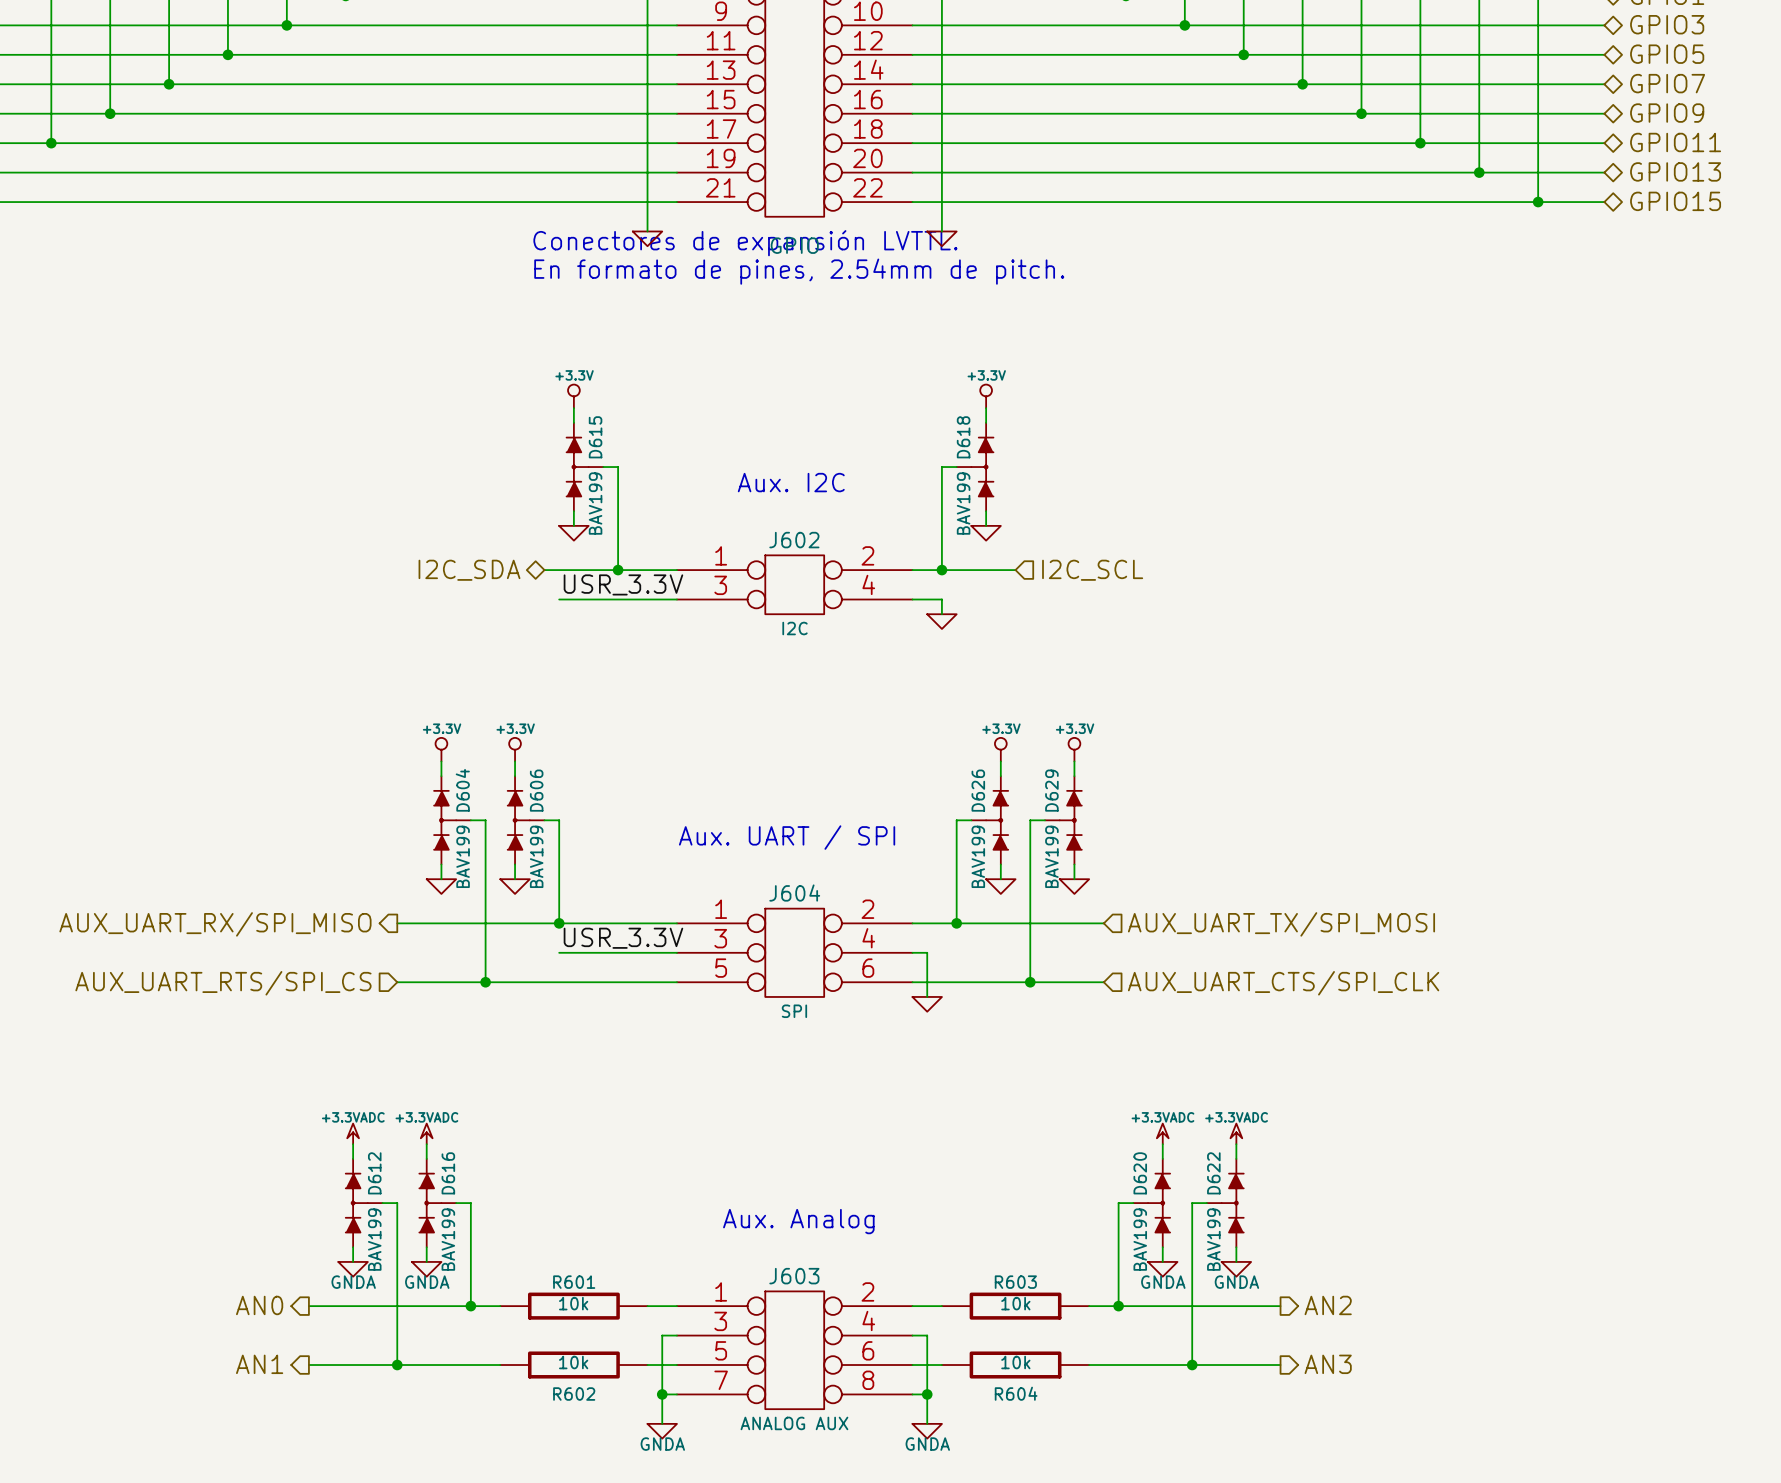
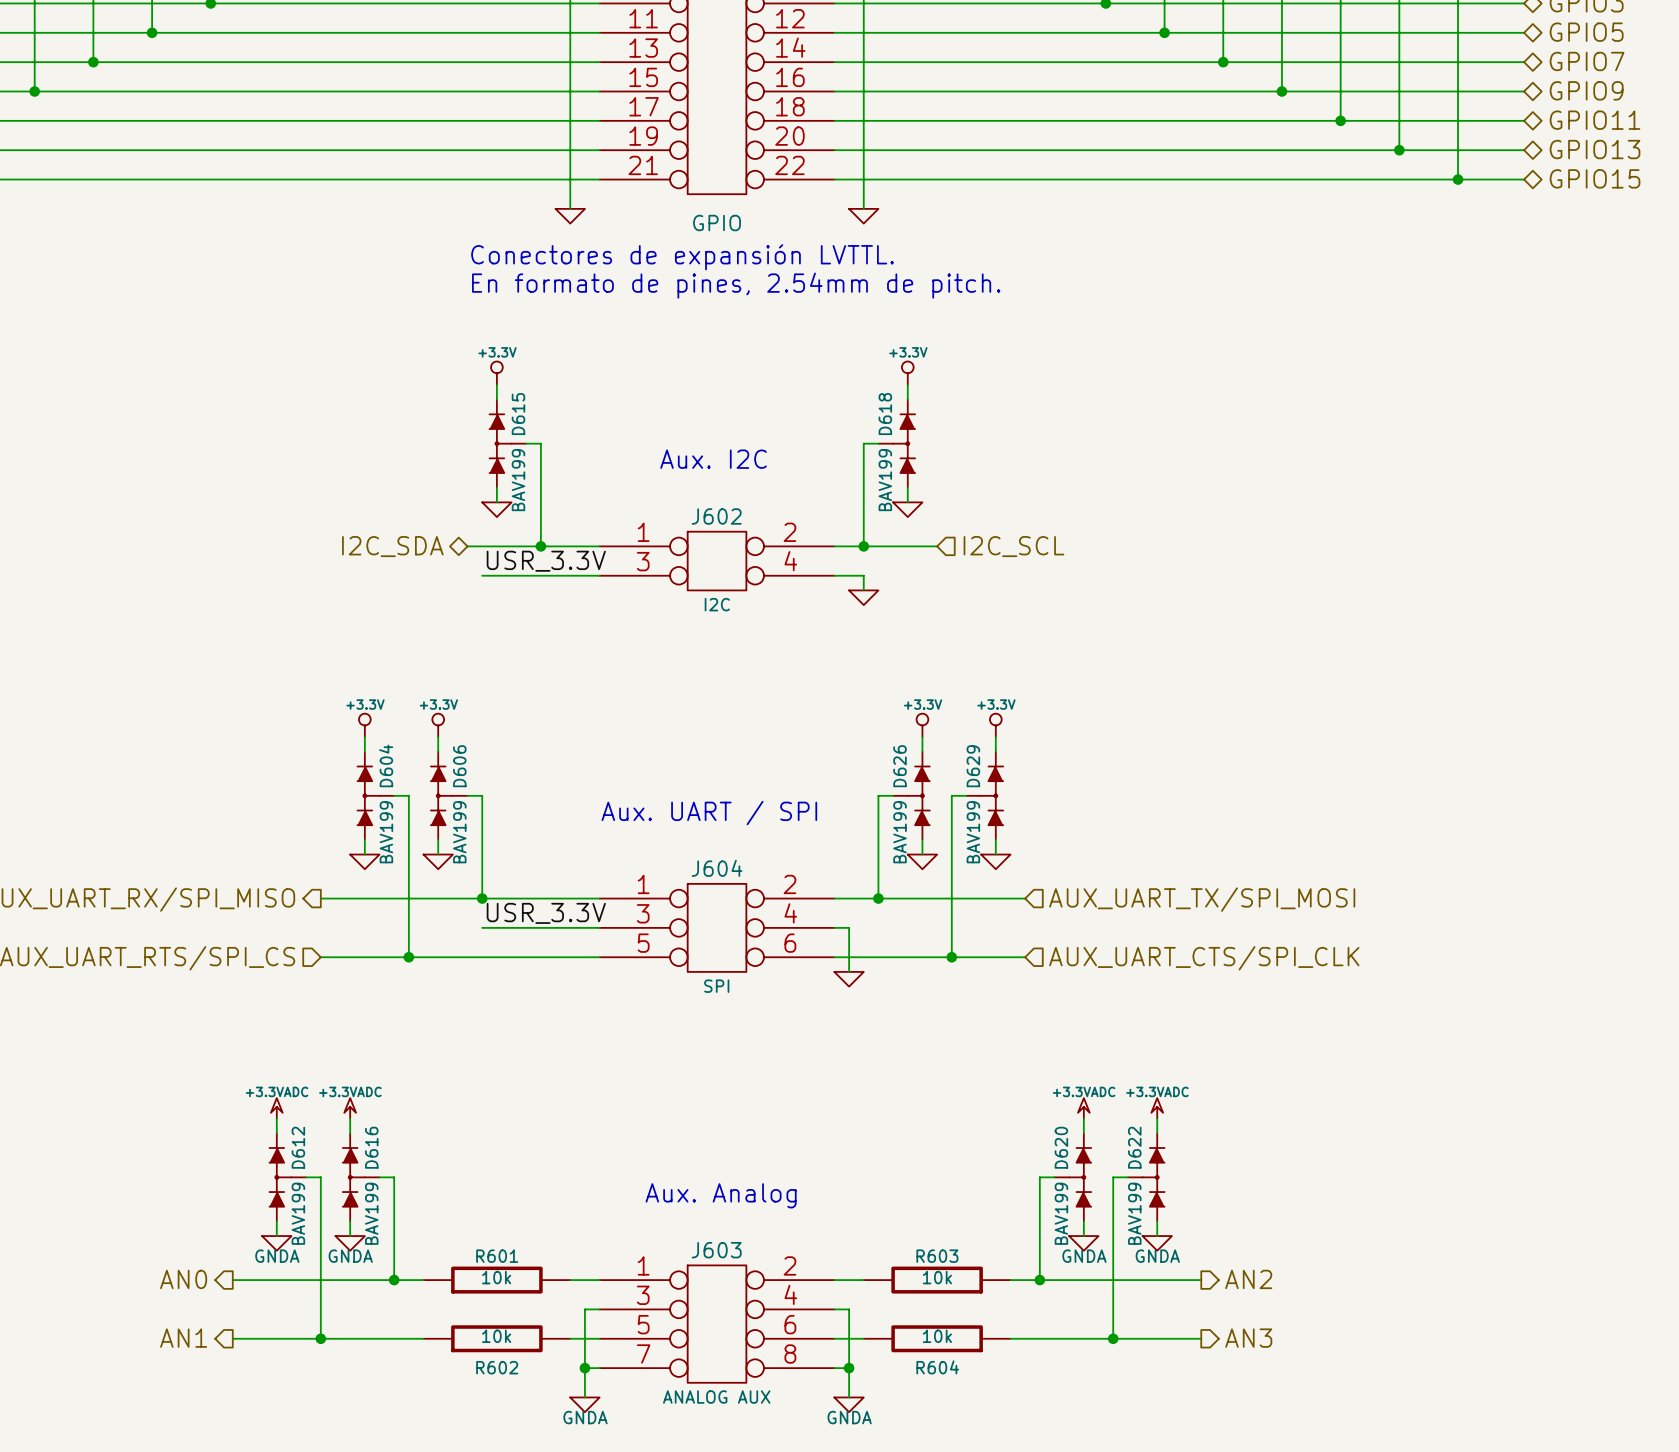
text position: Conectores de expansión LVTTL. (745, 243) -> Conectores de expansión LVTTL. (682, 257)
text position: En formato de pines, 2.54mm de pitch. (799, 271) -> En formato de pines, 2.54mm de pitch. (736, 285)

